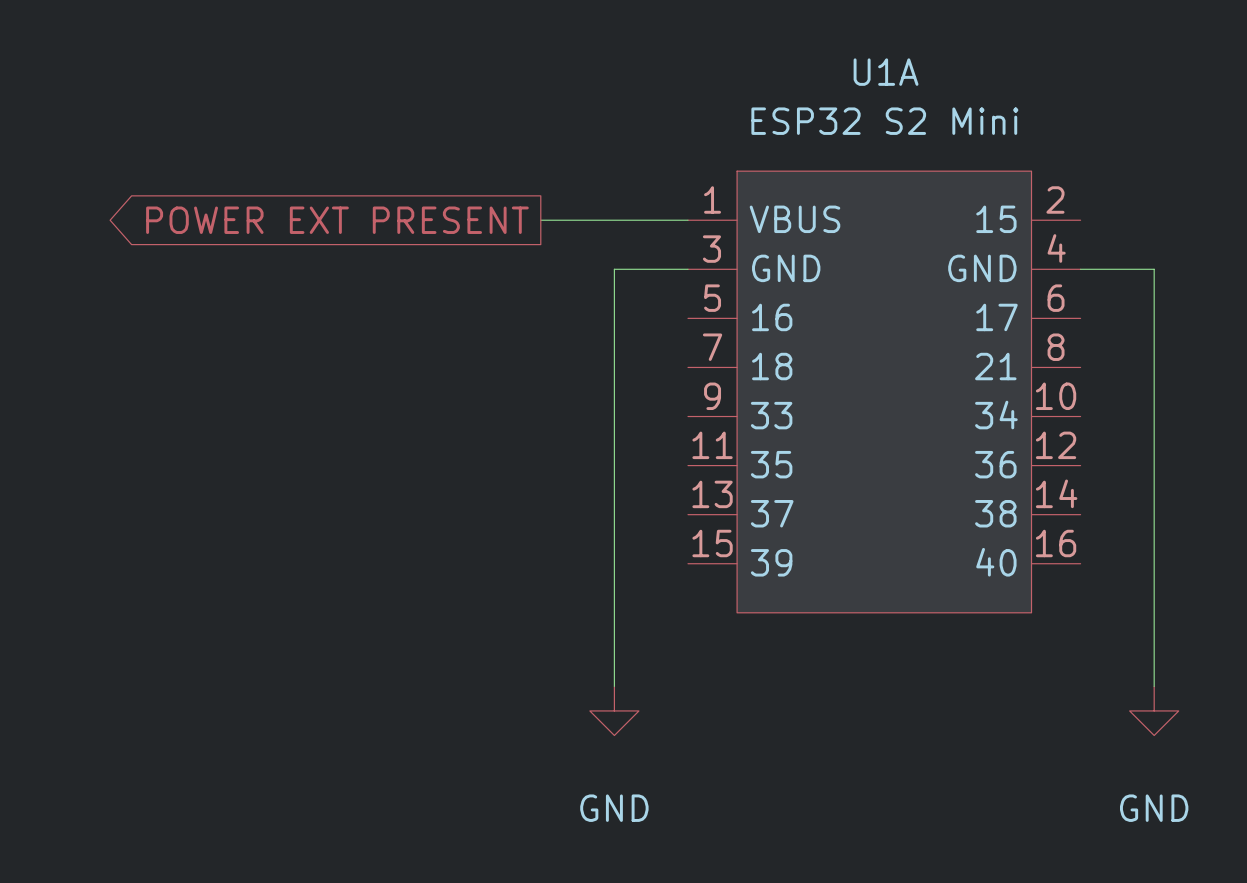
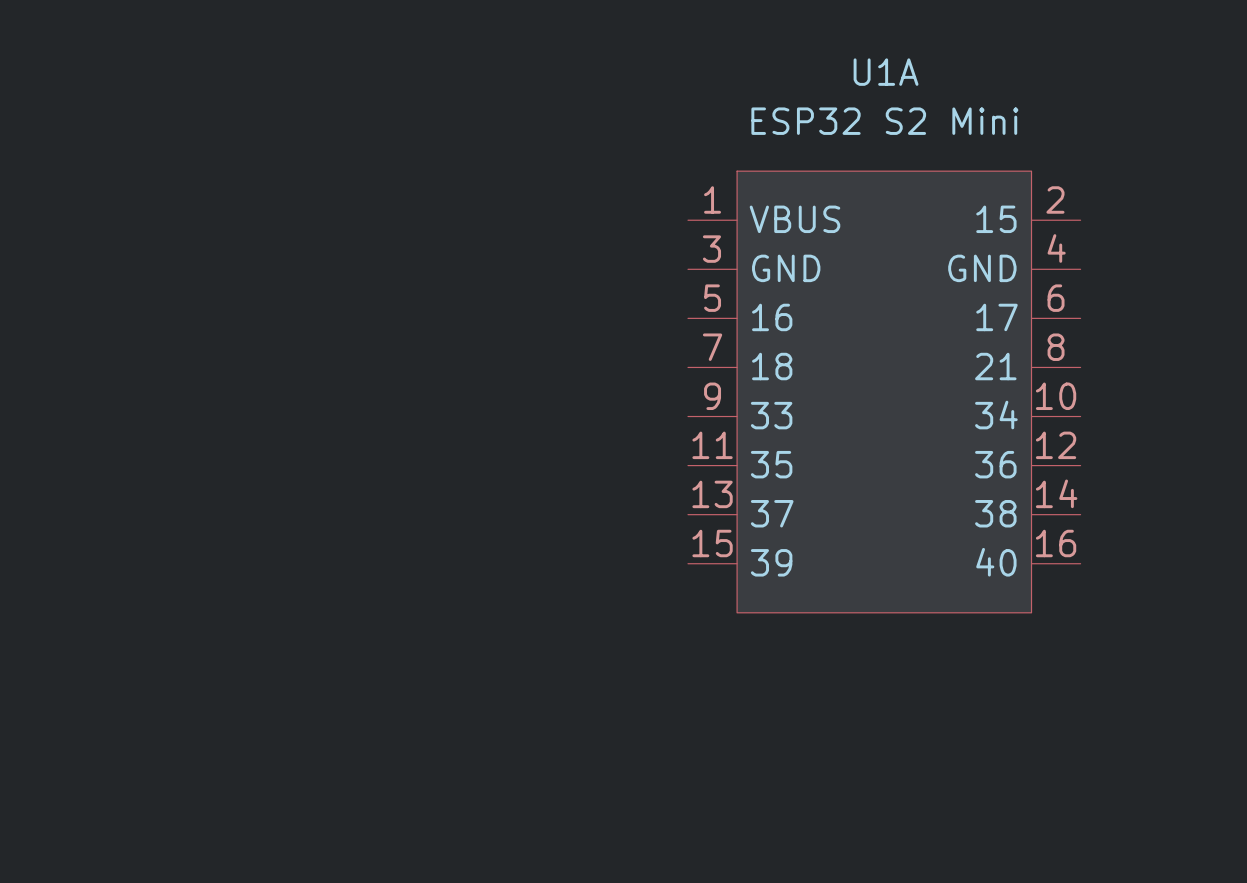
global label: POWER EXT PRESENT (337, 220) -> none
wire: (540, 220) (688, 220) -> none
wire: (688, 269) (614, 269) (614, 686) -> none
wire: (1080, 269) (1154, 269) (1154, 686) -> none
power symbol: GND (614, 710) -> none
power symbol: GND (1154, 710) -> none

